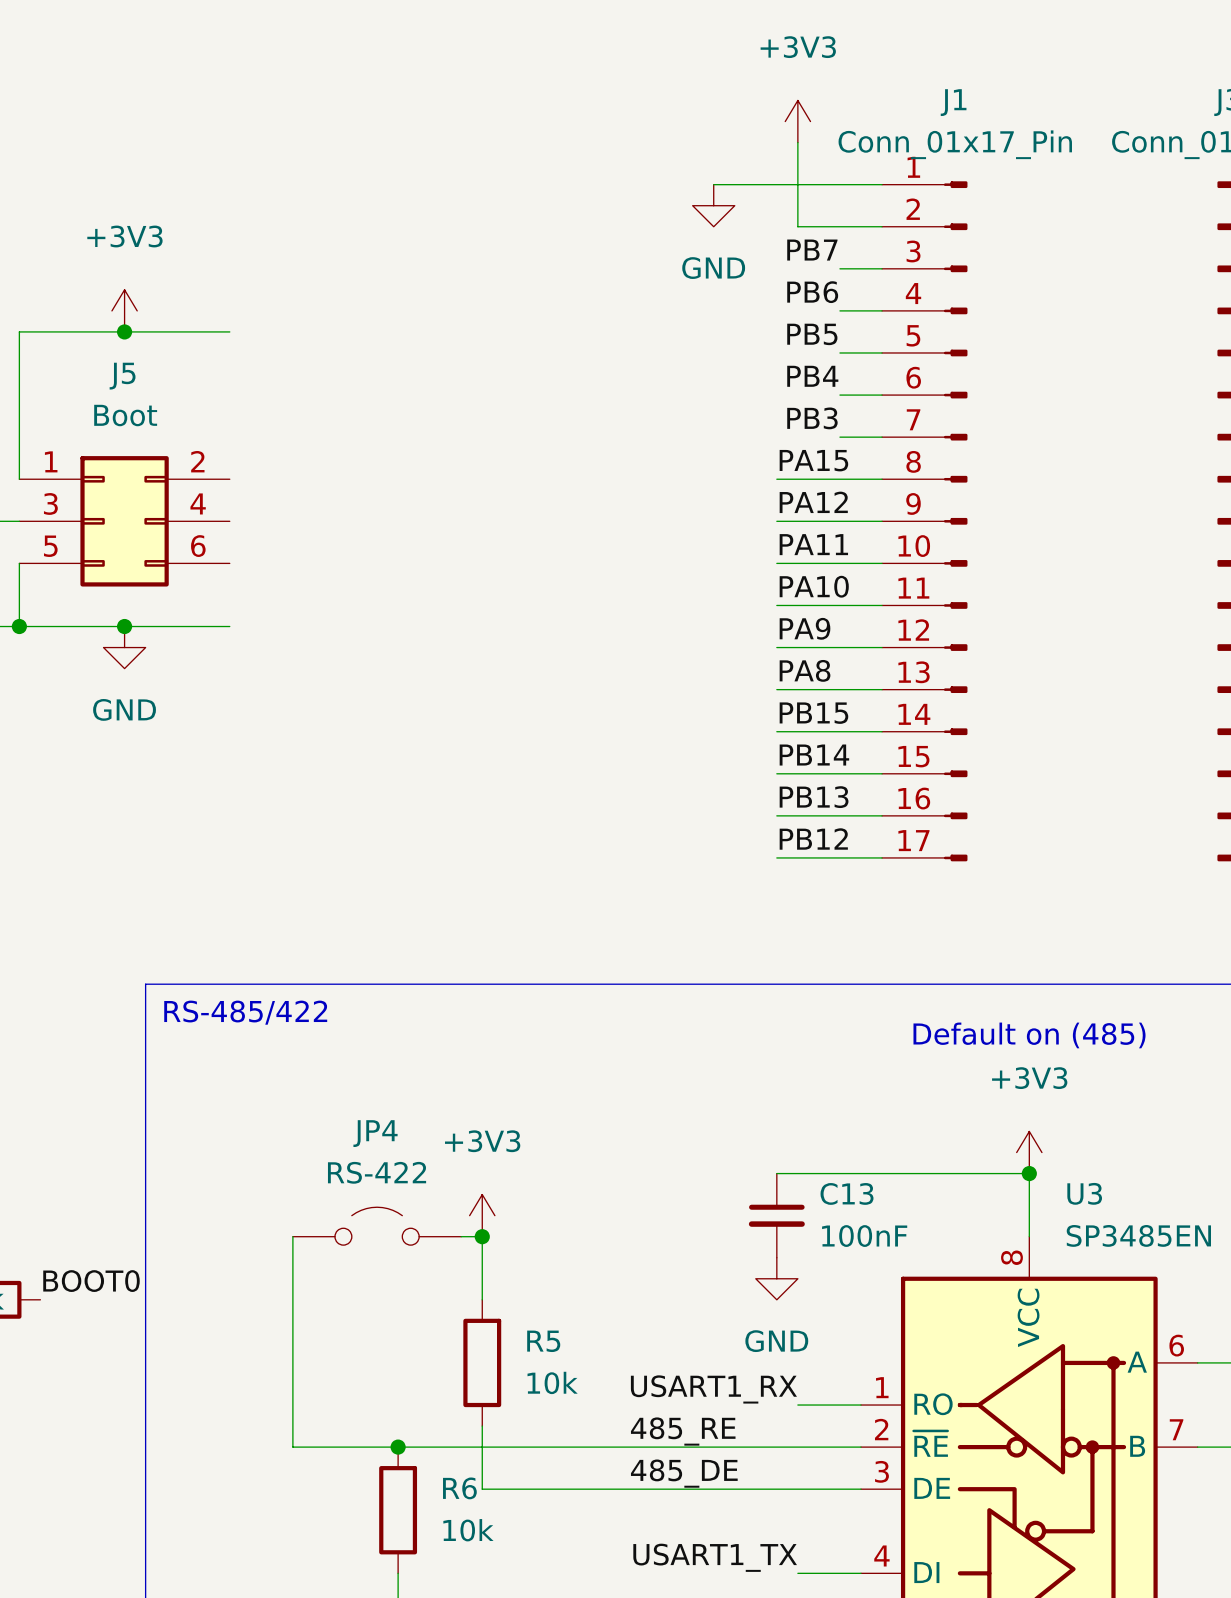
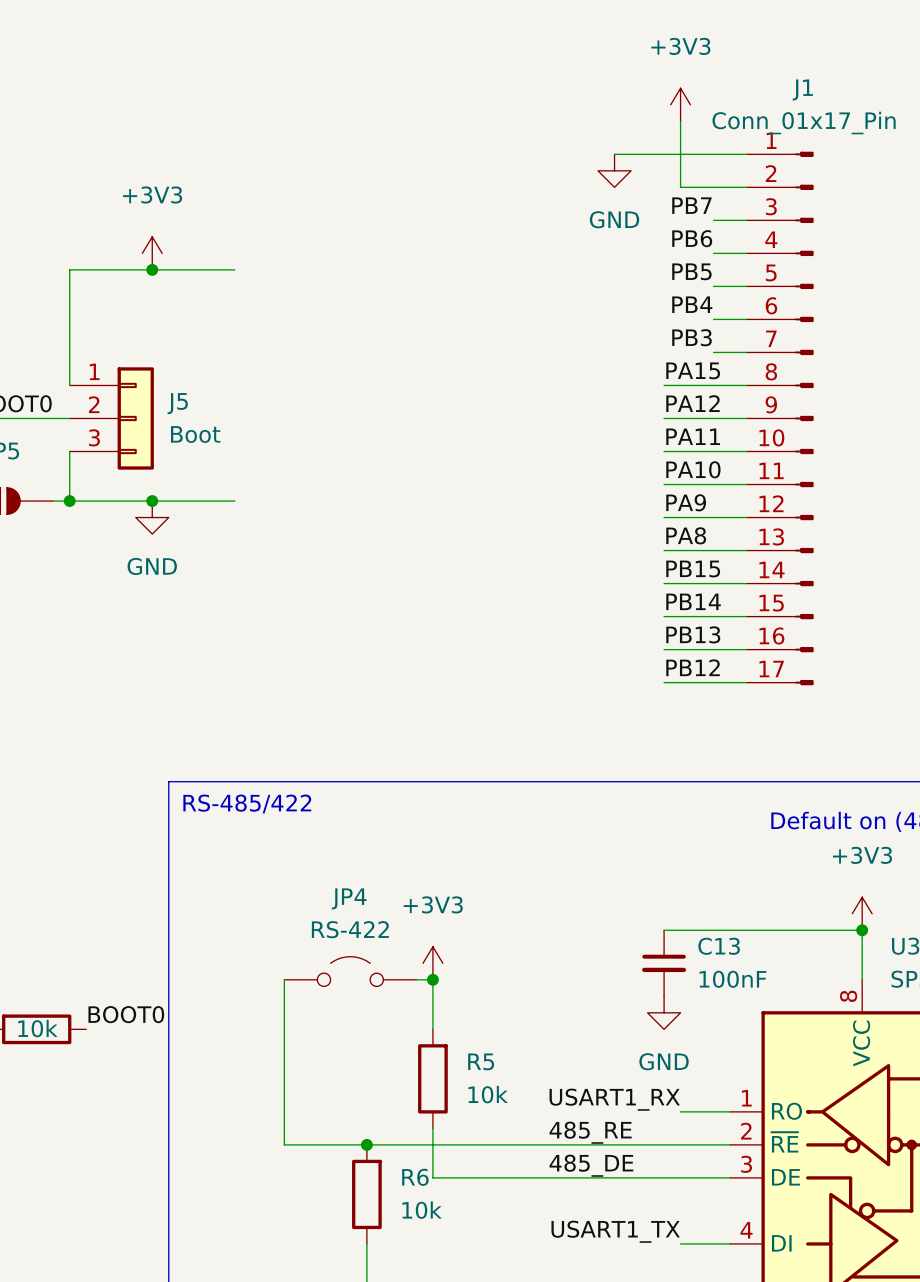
J5 name position: J5 (122, 376) -> J5 (177, 403)
J5 value position: Boot (125, 415) -> Boot (195, 434)
J5 symbol: [19, 456, 230, 587] -> [69, 367, 154, 470]

